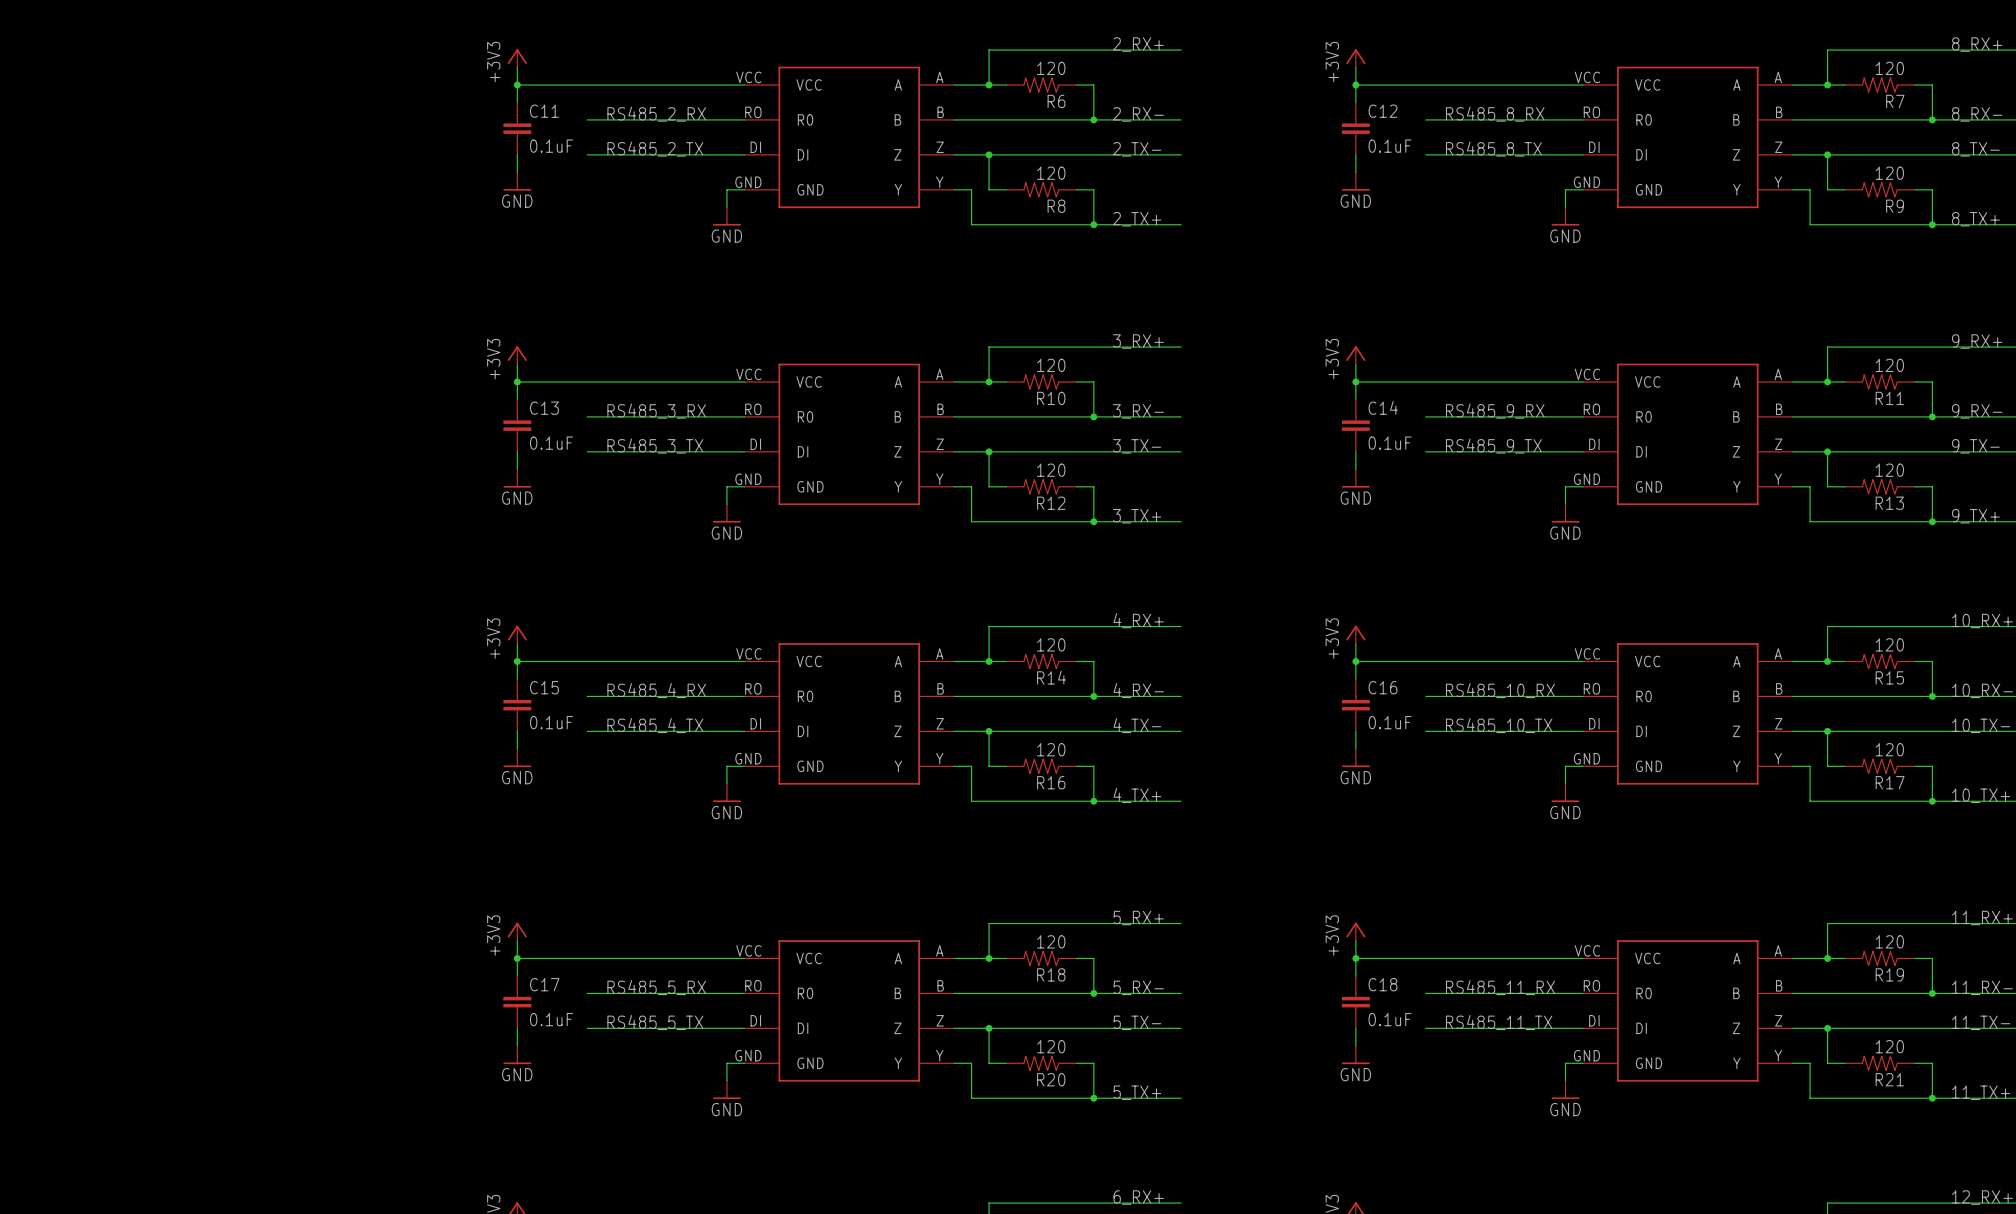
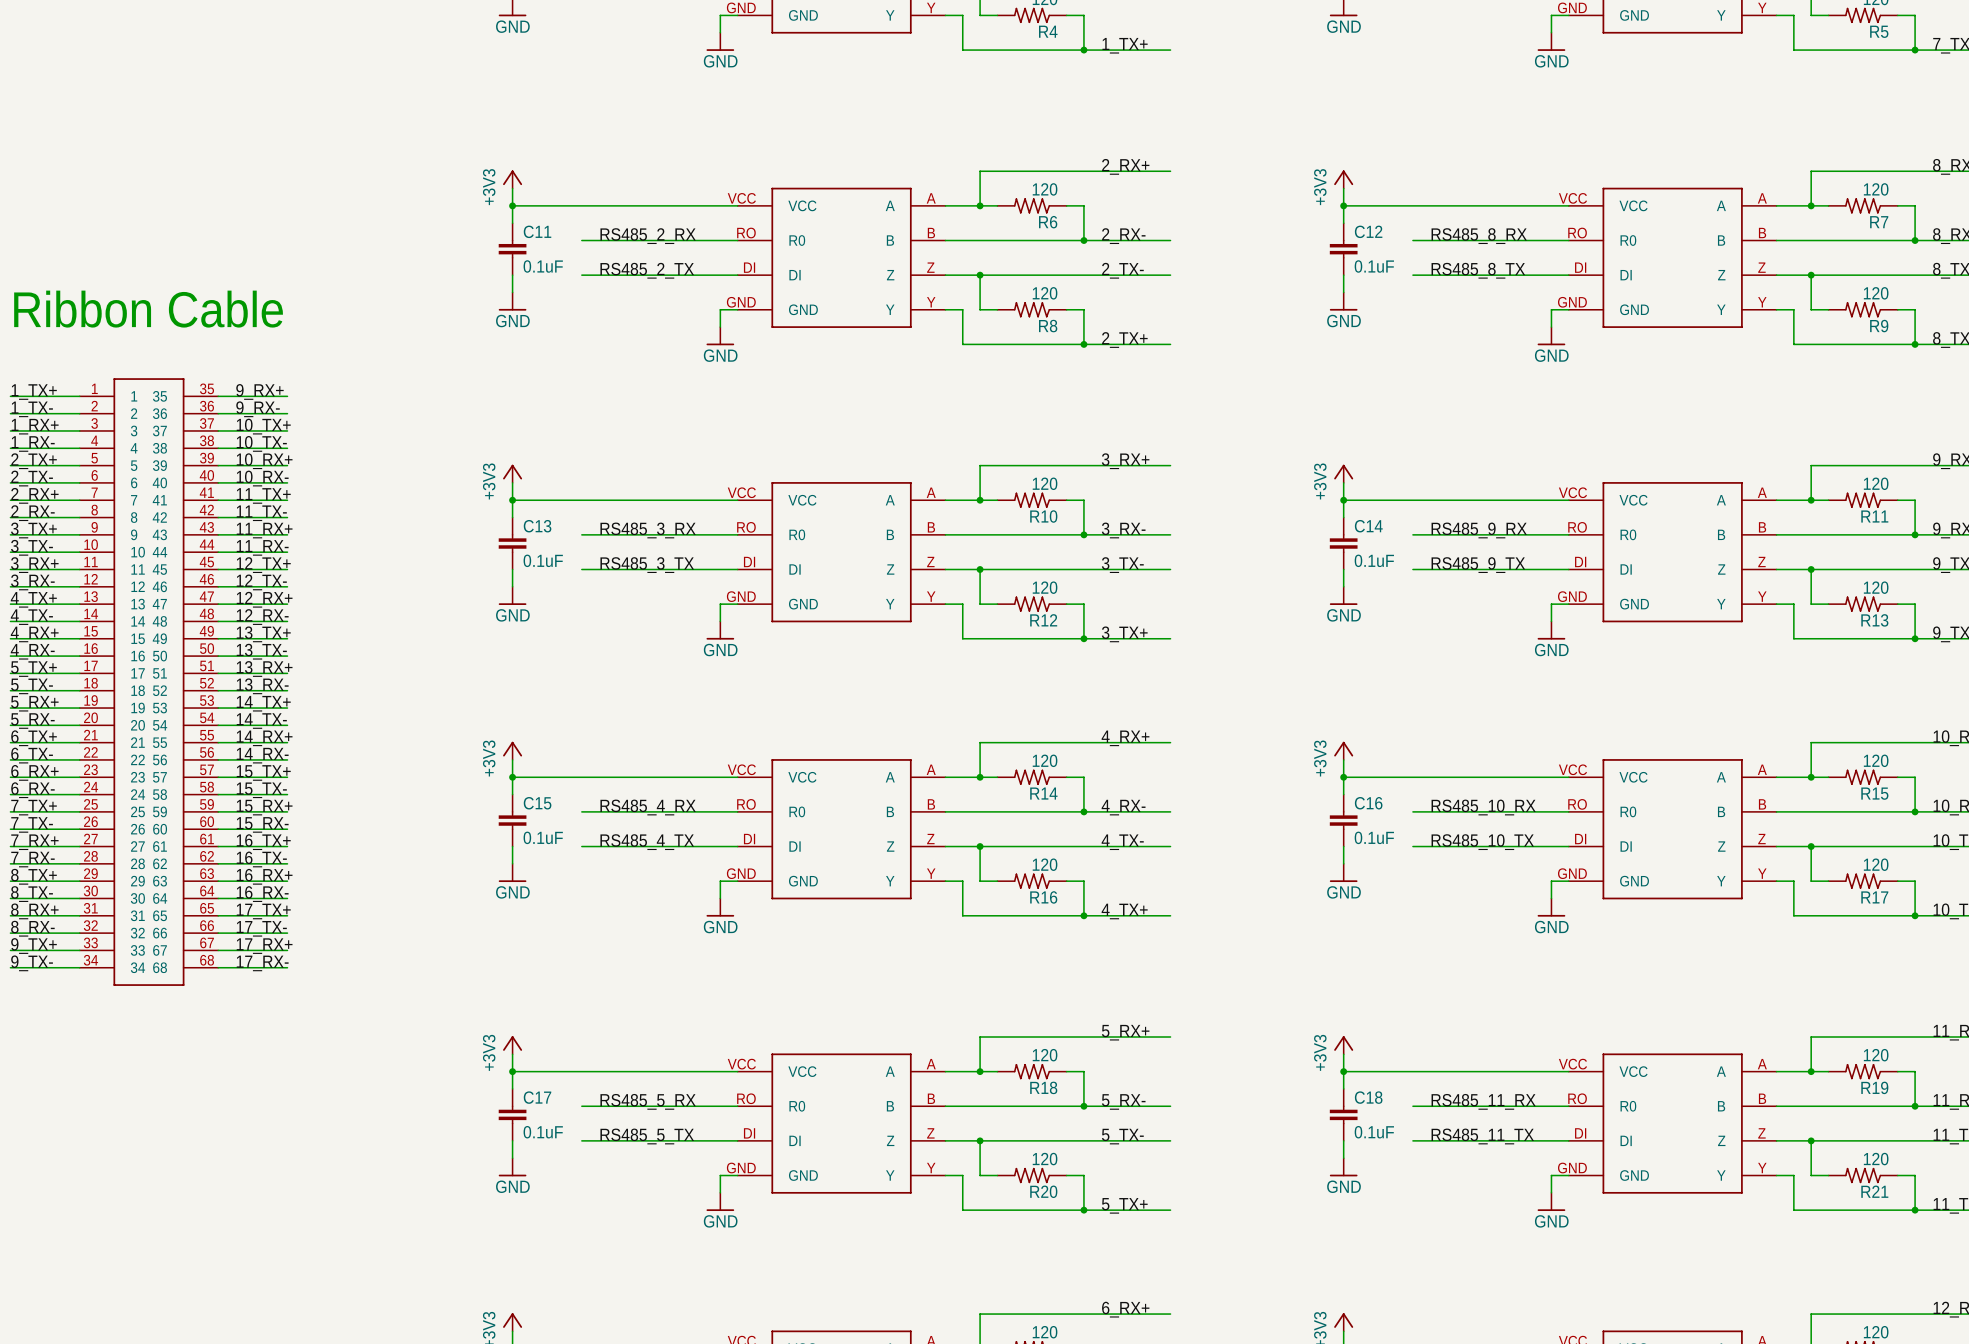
text: none -> Ribbon Cable (148, 309)
label: none -> 1_TX+ (34, 392)
label: none -> 9_RX+ (259, 391)
wire: none -> (10, 396) (79, 396)
wire: none -> (218, 396) (287, 396)
label: none -> 1_TX- (32, 409)
label: none -> 9_RX- (258, 409)
wire: none -> (10, 413) (79, 413)
wire: none -> (218, 413) (287, 413)
label: none -> 1_RX+ (35, 426)
label: none -> 10_TX+ (263, 426)
wire: none -> (10, 430) (79, 430)
wire: none -> (218, 430) (287, 430)
label: none -> 1_RX- (33, 443)
label: none -> 10_TX- (261, 443)
wire: none -> (10, 448) (79, 448)
wire: none -> (218, 448) (287, 448)
label: none -> 2_TX+ (34, 461)
label: none -> 10_RX+ (264, 461)
wire: none -> (10, 465) (79, 465)
wire: none -> (218, 465) (287, 465)
label: none -> 2_TX- (32, 478)
label: none -> 10_RX- (262, 478)
wire: none -> (10, 482) (79, 482)
wire: none -> (218, 482) (287, 482)
label: none -> 2_RX+ (34, 495)
label: none -> 11_TX+ (263, 495)
wire: none -> (10, 500) (79, 500)
wire: none -> (218, 500) (287, 500)
label: none -> 2_RX- (32, 513)
label: none -> 11_TX- (261, 513)
wire: none -> (10, 517) (79, 517)
wire: none -> (218, 517) (287, 517)
label: none -> 3_TX+ (33, 530)
label: none -> 11_RX+ (264, 530)
wire: none -> (10, 534) (79, 534)
wire: none -> (218, 534) (287, 534)
label: none -> 3_TX- (31, 547)
label: none -> 11_RX- (262, 547)
wire: none -> (10, 552) (79, 552)
wire: none -> (218, 552) (287, 552)
label: none -> 3_RX+ (34, 565)
label: none -> 12_TX+ (263, 565)
wire: none -> (10, 569) (79, 569)
wire: none -> (218, 569) (287, 569)
label: none -> 3_RX- (32, 582)
label: none -> 12_TX- (261, 582)
wire: none -> (10, 586) (79, 586)
wire: none -> (218, 586) (287, 586)
label: none -> 4_TX+ (33, 599)
label: none -> 12_RX+ (264, 599)
wire: none -> (10, 604) (79, 604)
wire: none -> (218, 604) (287, 604)
label: none -> 4_TX- (31, 617)
label: none -> 12_RX- (262, 617)
wire: none -> (10, 621) (79, 621)
wire: none -> (218, 621) (287, 621)
label: none -> 4_RX+ (34, 634)
label: none -> 13_TX+ (263, 634)
wire: none -> (10, 638) (79, 638)
wire: none -> (218, 638) (287, 638)
label: none -> 4_RX- (32, 651)
label: none -> 13_TX- (261, 651)
wire: none -> (10, 656) (79, 656)
wire: none -> (218, 656) (287, 656)
label: none -> 5_TX+ (33, 669)
label: none -> 13_RX+ (264, 668)
wire: none -> (10, 673) (79, 673)
wire: none -> (218, 673) (287, 673)
part: none -> (148, 682)
label: none -> 5_TX- (31, 686)
label: none -> 13_RX- (262, 686)
wire: none -> (10, 690) (79, 690)
wire: none -> (218, 690) (287, 690)
label: none -> 14_TX+ (263, 703)
label: none -> 5_RX+ (34, 703)
wire: none -> (10, 708) (79, 708)
wire: none -> (218, 708) (287, 708)
label: none -> 5_RX- (32, 721)
label: none -> 14_TX- (261, 721)
wire: none -> (10, 725) (79, 725)
wire: none -> (218, 725) (287, 725)
label: none -> 14_RX+ (264, 738)
label: none -> 6_TX+ (34, 738)
wire: none -> (10, 742) (79, 742)
wire: none -> (218, 742) (287, 742)
label: none -> 6_TX- (32, 755)
label: none -> 14_RX- (262, 755)
wire: none -> (10, 759) (79, 759)
wire: none -> (218, 759) (287, 759)
label: none -> 6_RX+ (34, 772)
label: none -> 15_TX+ (263, 772)
wire: none -> (10, 777) (79, 777)
wire: none -> (218, 777) (287, 777)
label: none -> 6_RX- (32, 790)
label: none -> 15_TX- (261, 790)
wire: none -> (10, 794) (79, 794)
wire: none -> (218, 794) (287, 794)
label: none -> 7_TX+ (34, 807)
label: none -> 15_RX+ (264, 807)
wire: none -> (10, 811) (79, 811)
wire: none -> (218, 811) (287, 811)
label: none -> 7_TX- (32, 824)
label: none -> 15_RX- (262, 824)
wire: none -> (10, 829) (79, 829)
wire: none -> (218, 829) (287, 829)
label: none -> 7_RX+ (34, 842)
label: none -> 16_TX+ (263, 842)
wire: none -> (10, 846) (79, 846)
wire: none -> (218, 846) (287, 846)
label: none -> 7_RX- (32, 859)
label: none -> 16_TX- (261, 859)
wire: none -> (10, 863) (79, 863)
wire: none -> (218, 863) (287, 863)
label: none -> 8_TX+ (33, 876)
label: none -> 16_RX+ (264, 876)
wire: none -> (10, 881) (79, 881)
wire: none -> (218, 881) (287, 881)
label: none -> 8_TX- (32, 894)
label: none -> 16_RX- (262, 894)
wire: none -> (10, 898) (79, 898)
wire: none -> (218, 898) (287, 898)
label: none -> 8_RX+ (34, 911)
label: none -> 17_TX+ (263, 911)
wire: none -> (10, 915) (79, 915)
wire: none -> (218, 915) (287, 915)
label: none -> 8_RX- (32, 928)
label: none -> 17_TX- (261, 928)
wire: none -> (10, 933) (79, 933)
wire: none -> (218, 933) (287, 933)
label: none -> 9_TX+ (34, 946)
label: none -> 17_RX+ (264, 946)
wire: none -> (10, 950) (79, 950)
wire: none -> (218, 950) (287, 950)
label: none -> 9_TX- (32, 963)
label: none -> 17_RX- (262, 963)
wire: none -> (10, 967) (79, 967)
wire: none -> (218, 967) (287, 967)

